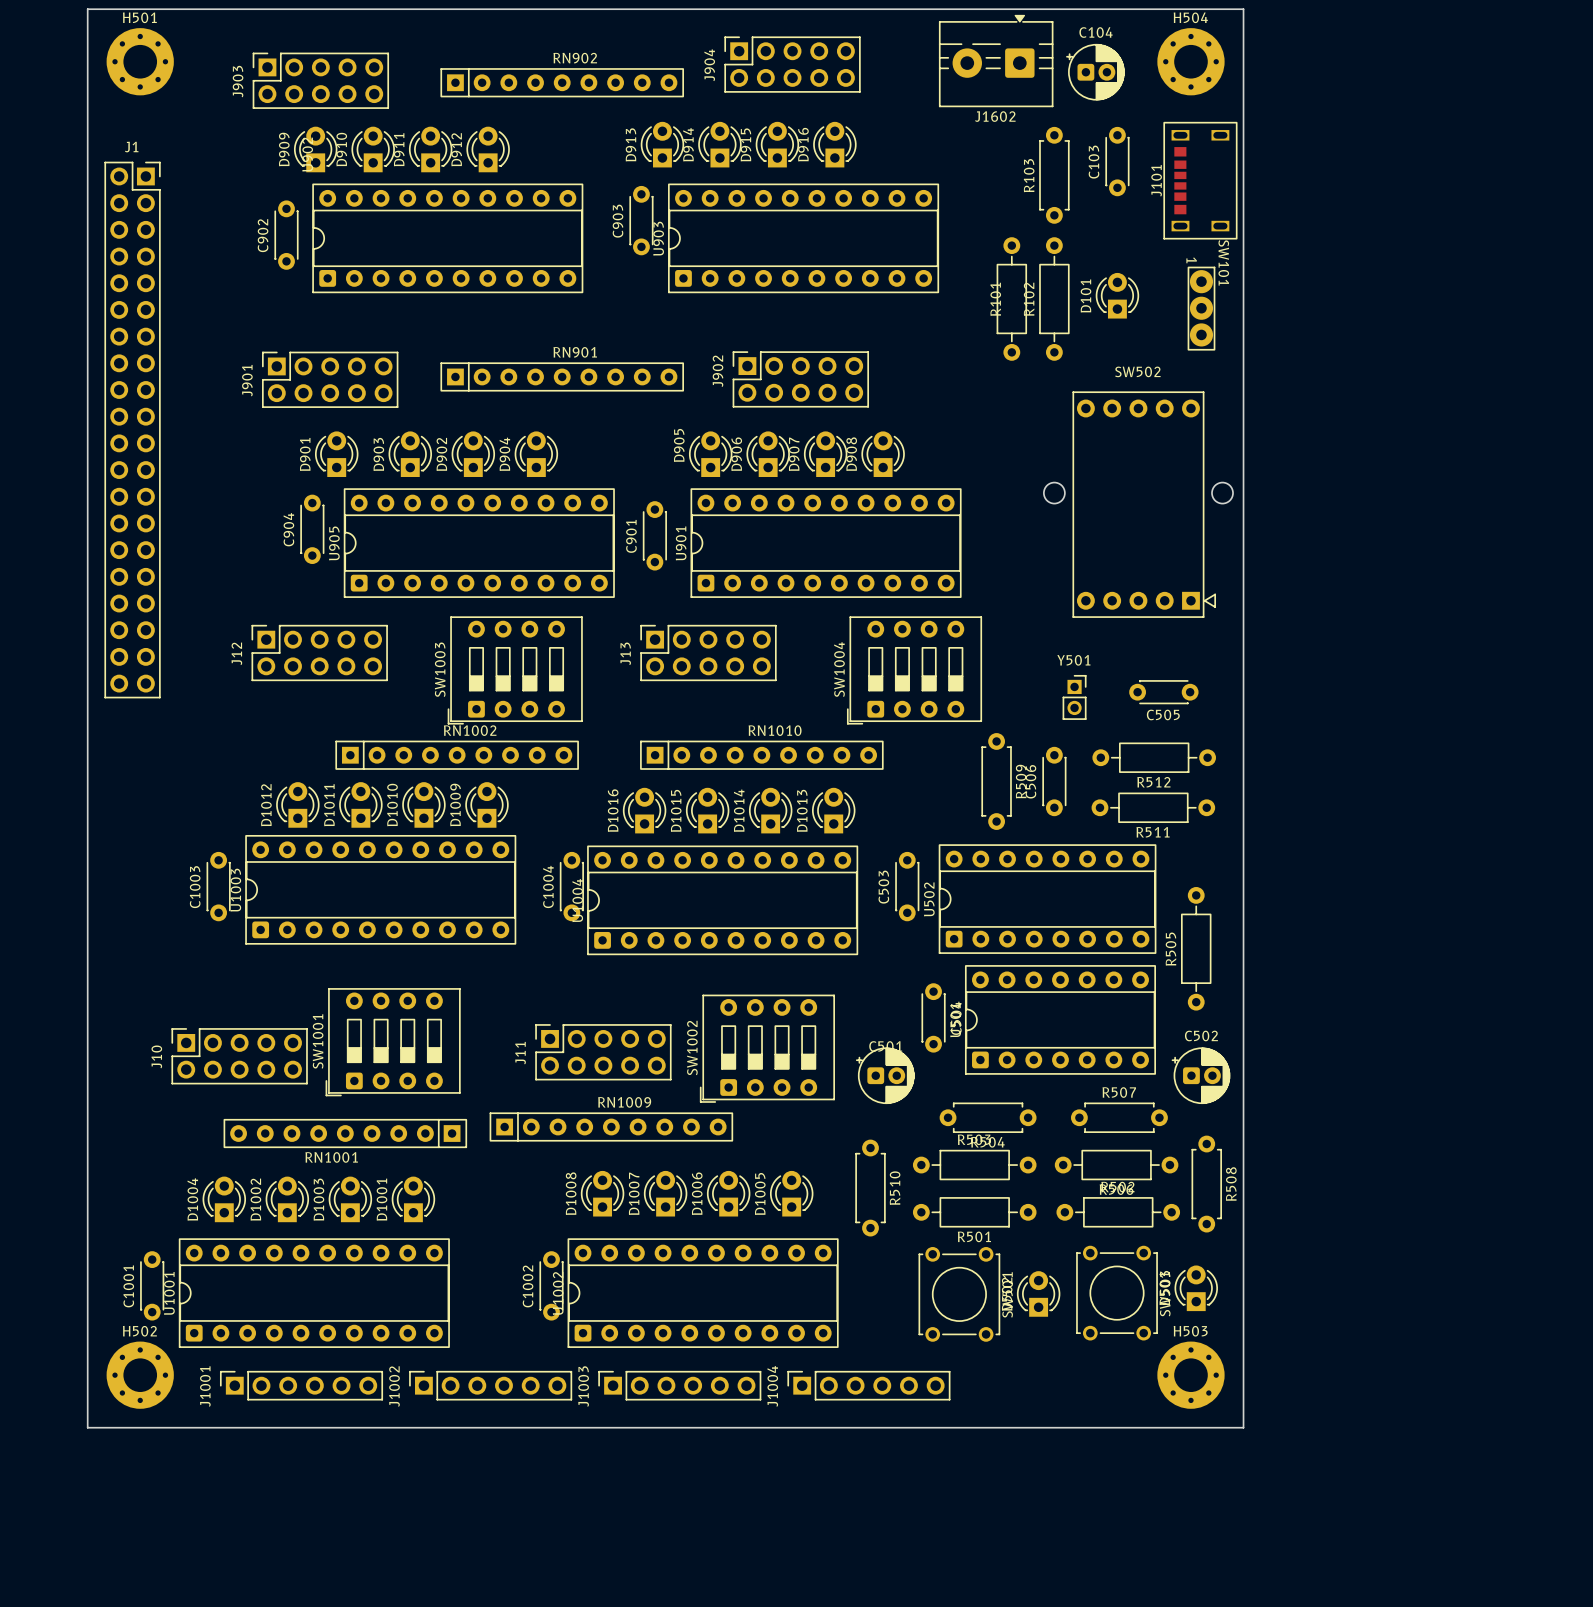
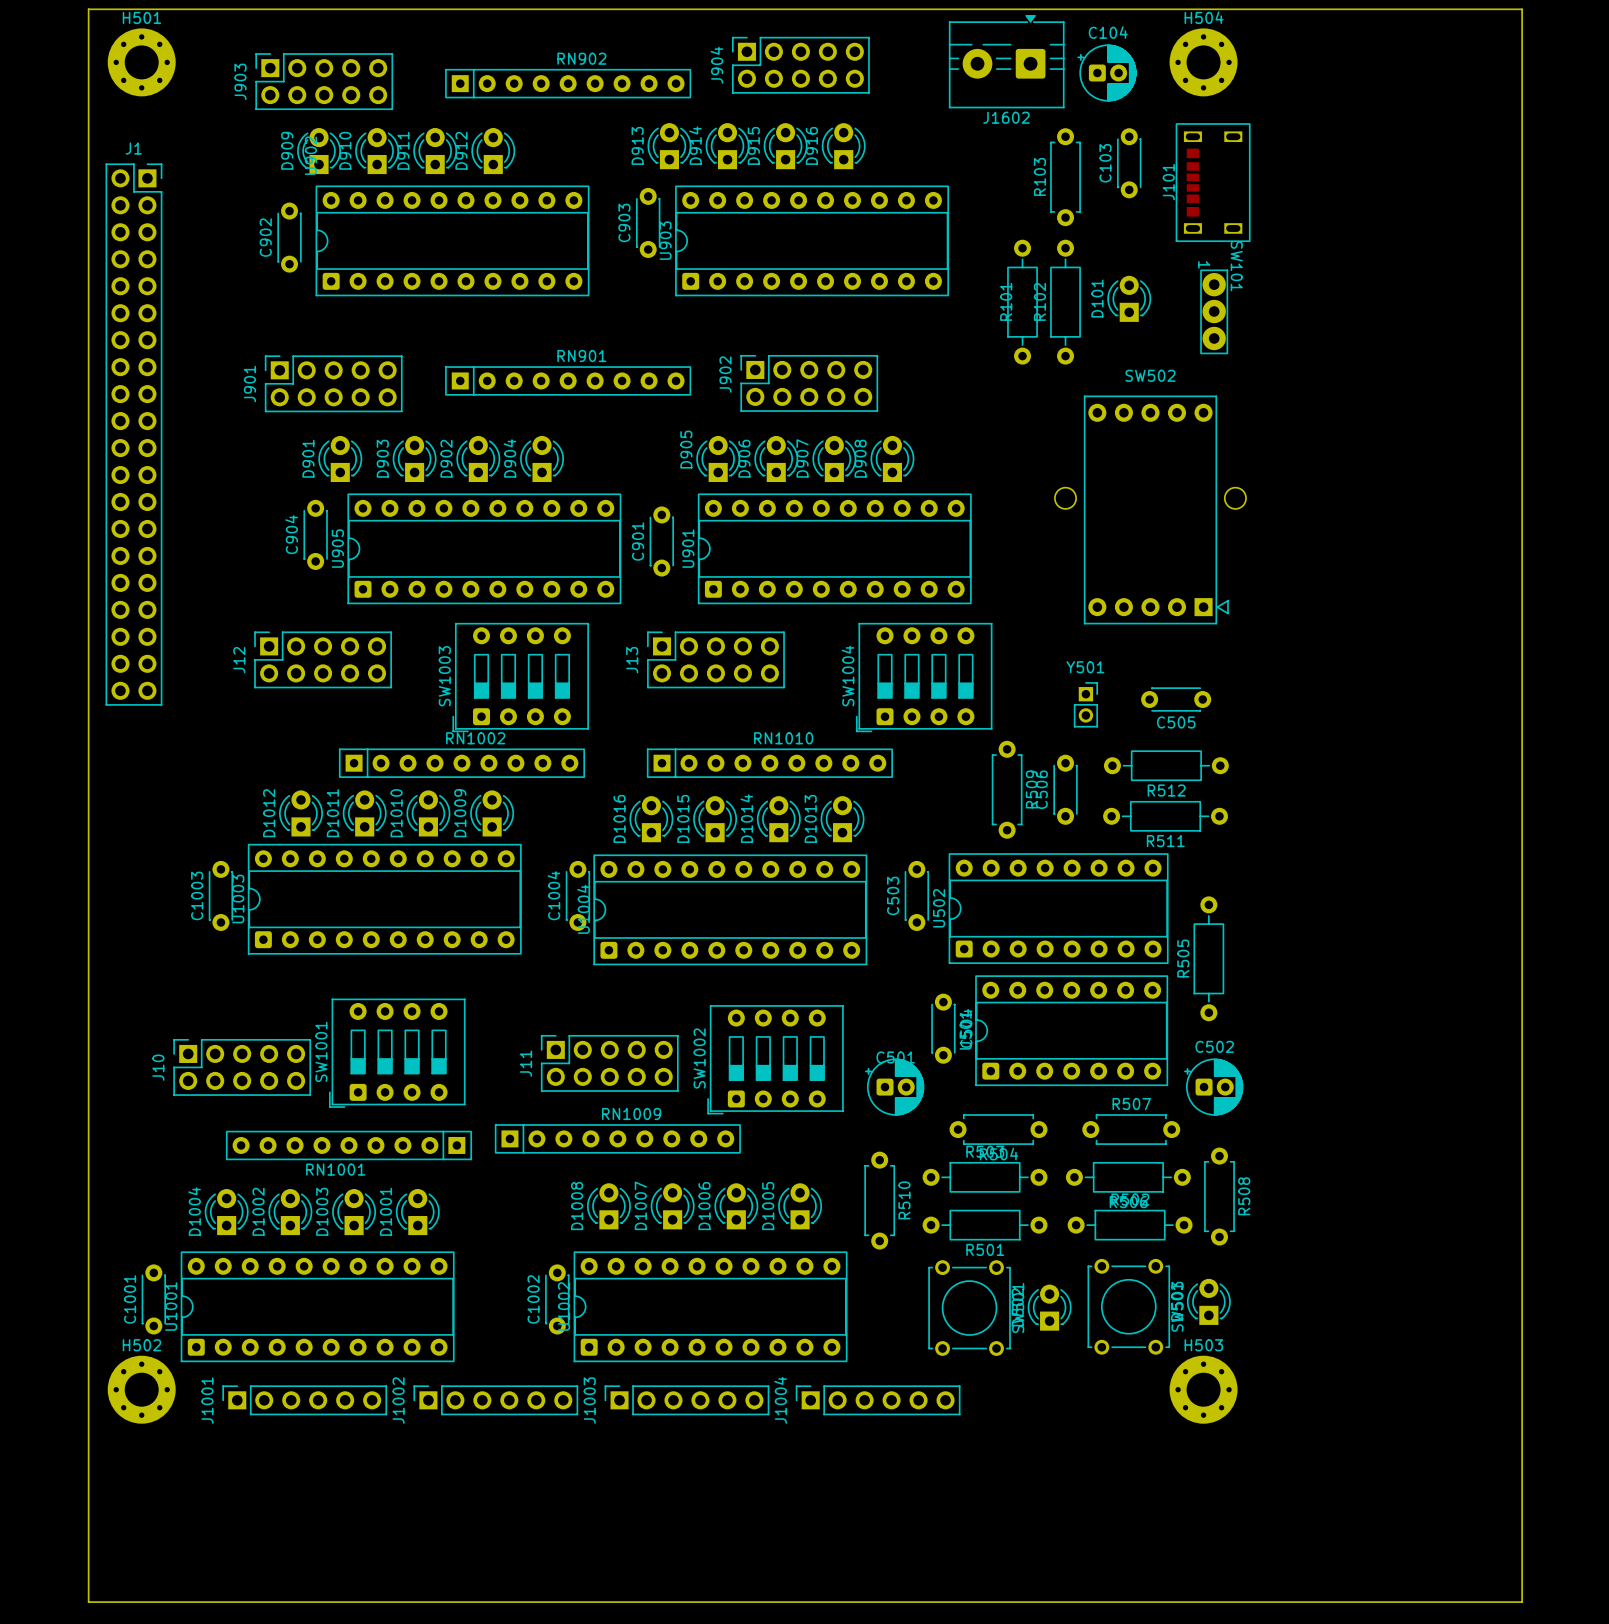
board edge: (1243, 9) (1243, 1427) (87, 1427) -> (1256, 9) (1522, 9) (1522, 1602) (88, 1602) (88, 1442)

